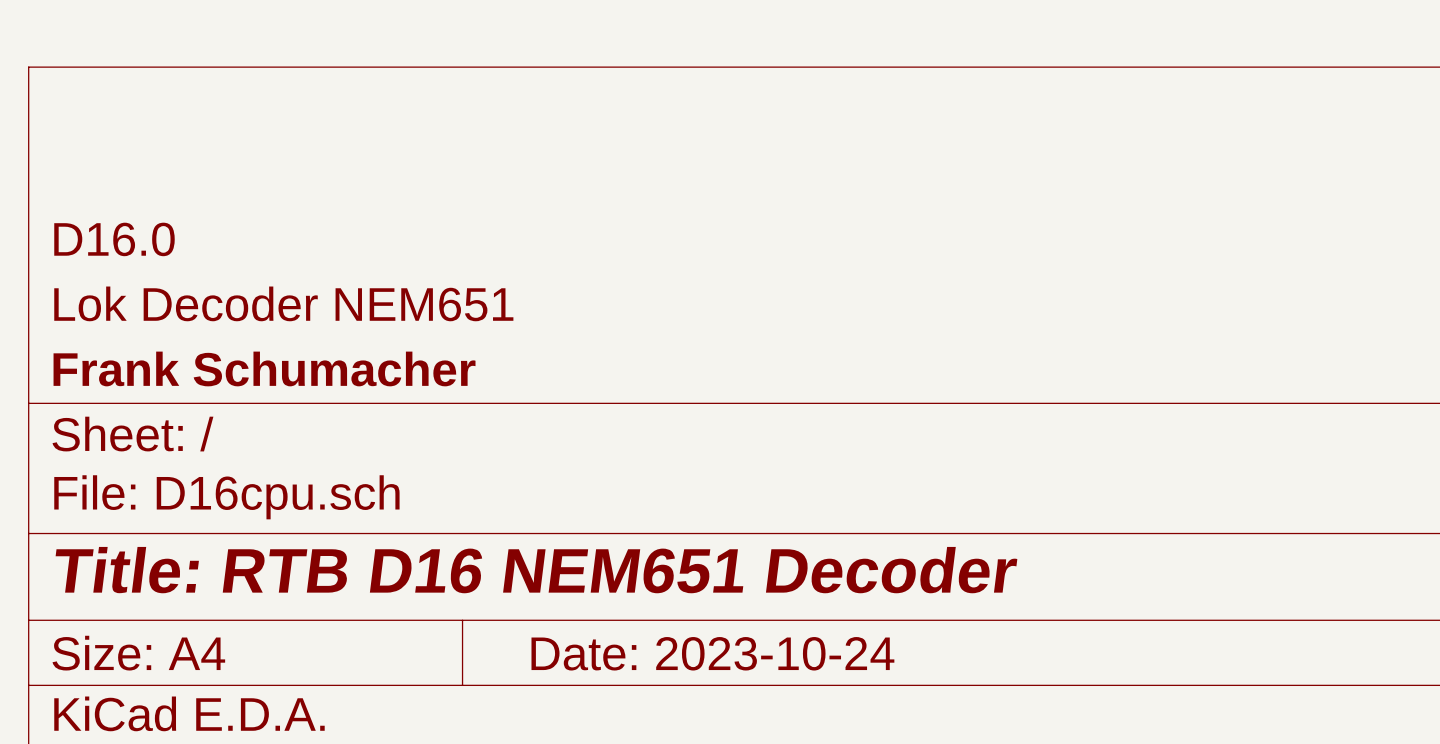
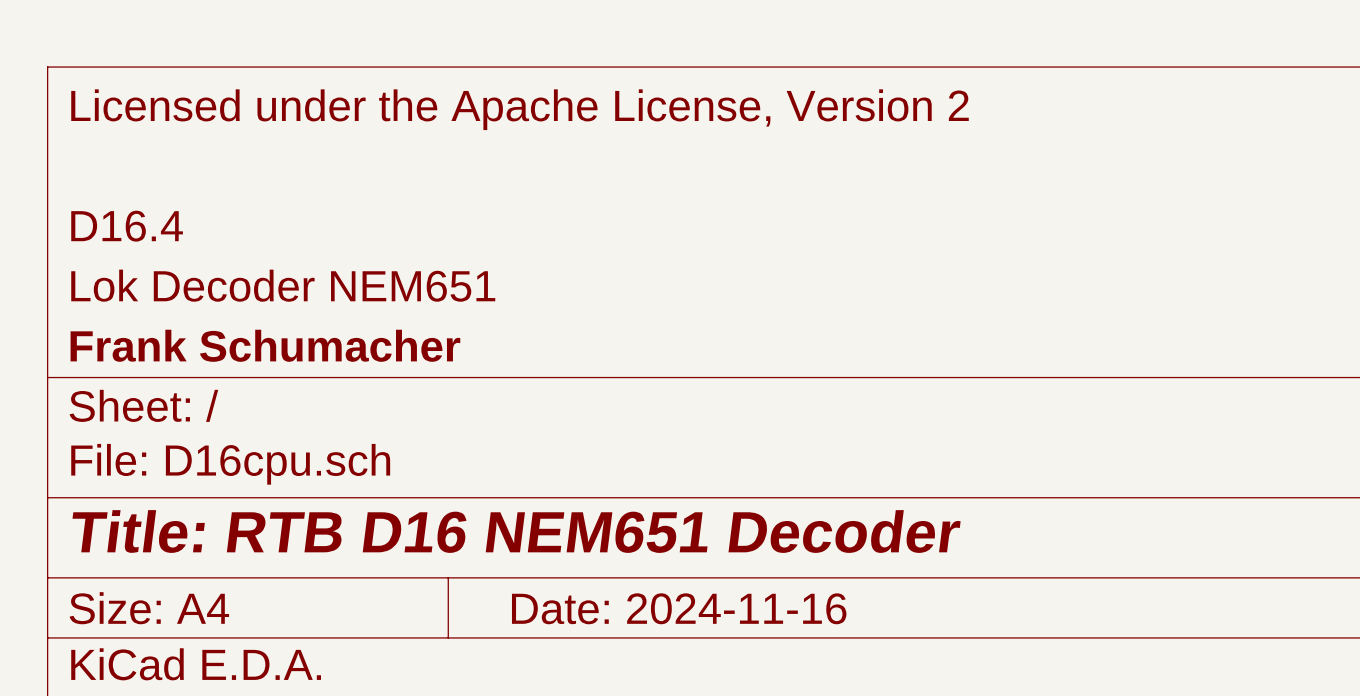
title block: none -> Licensed under the Apache License, Version 2 (520, 109)
title block: D16.0 (114, 239) -> D16.4 (127, 226)
title block: Date: 2023-10-24 (712, 653) -> Date: 2024-11-16 (679, 608)

